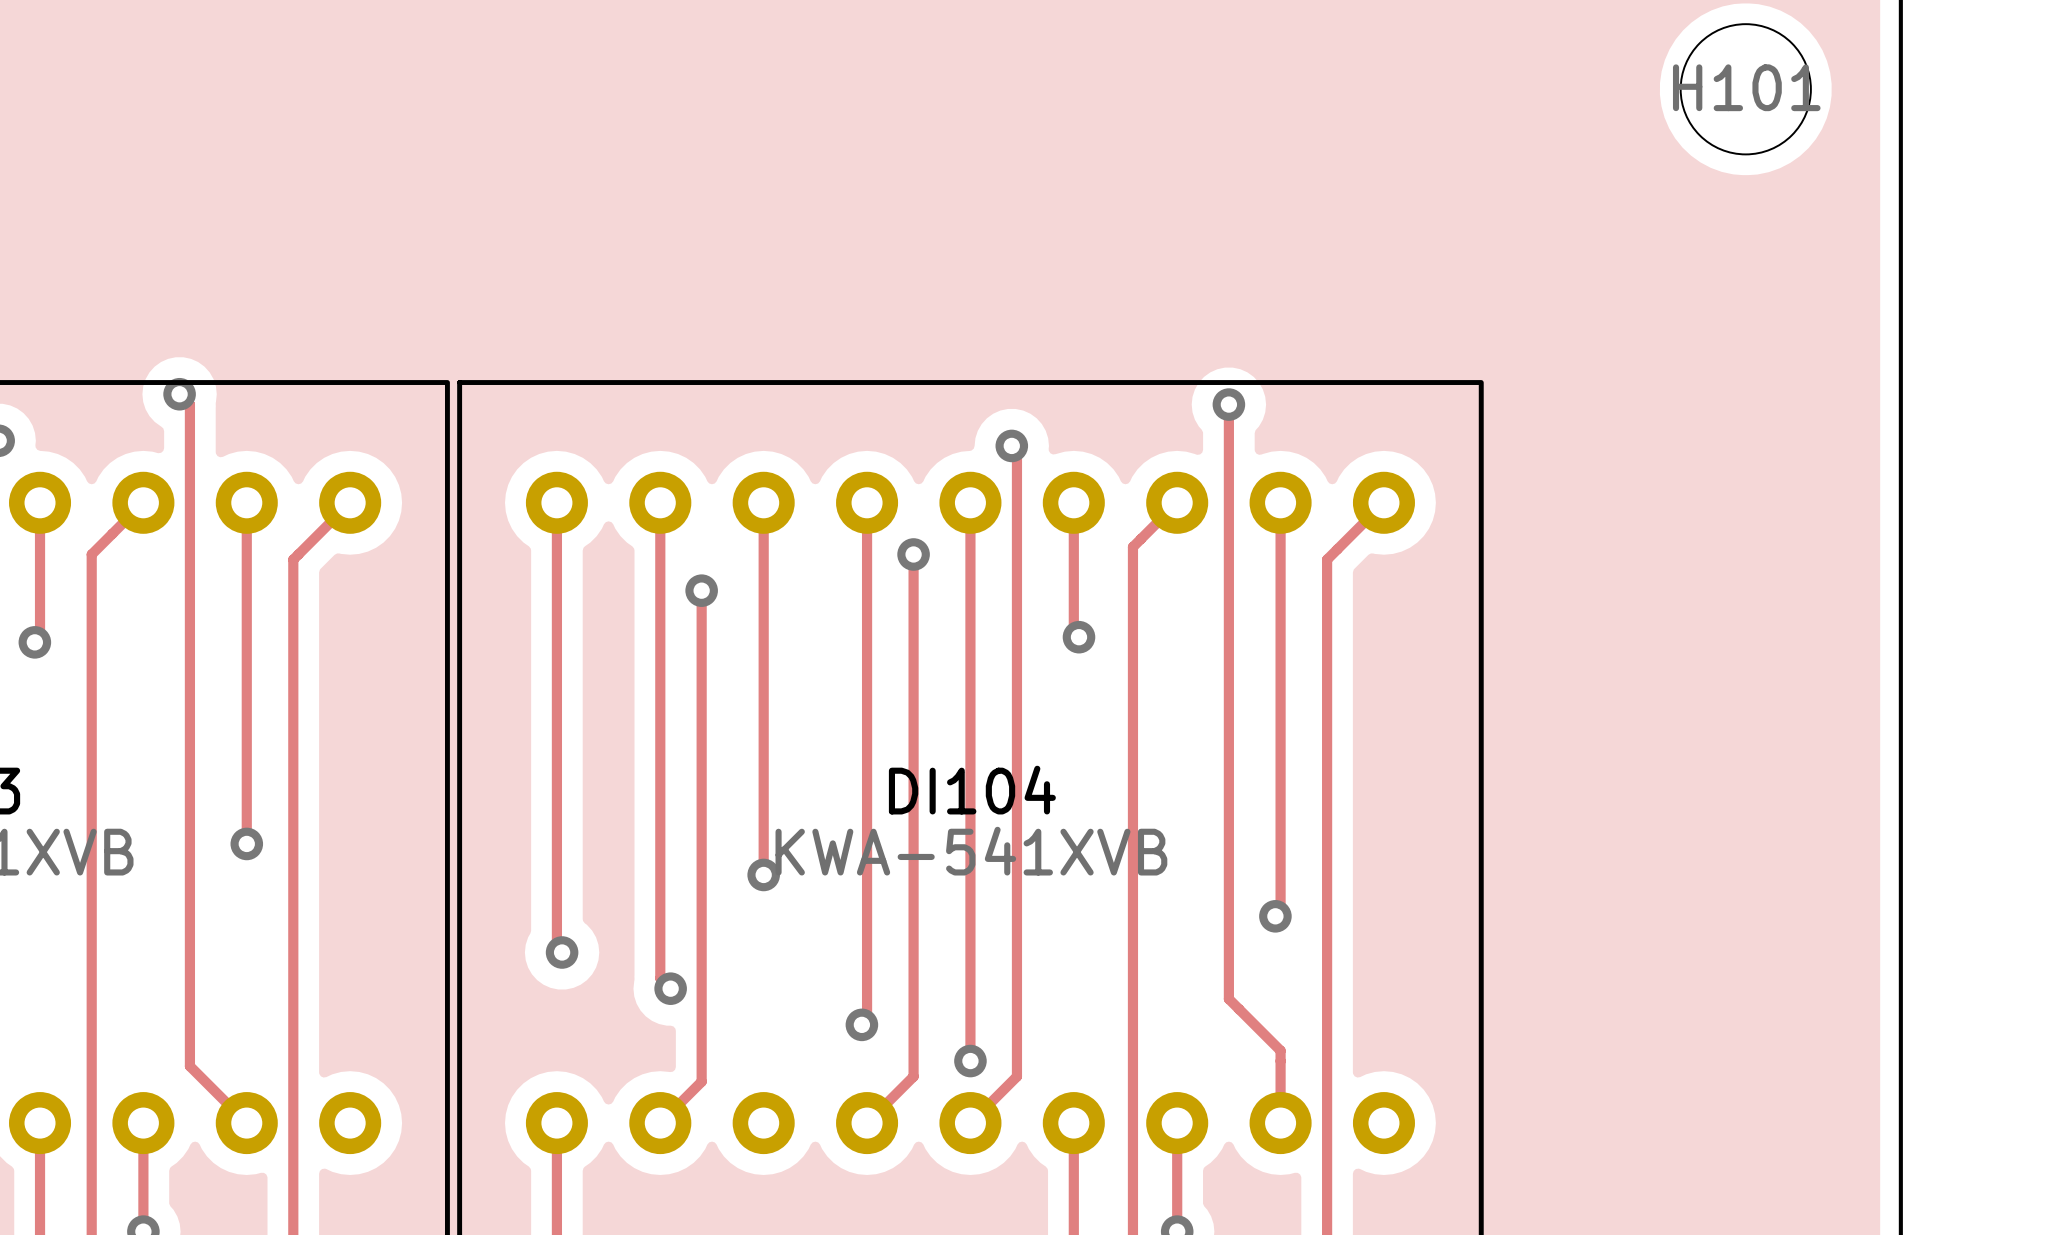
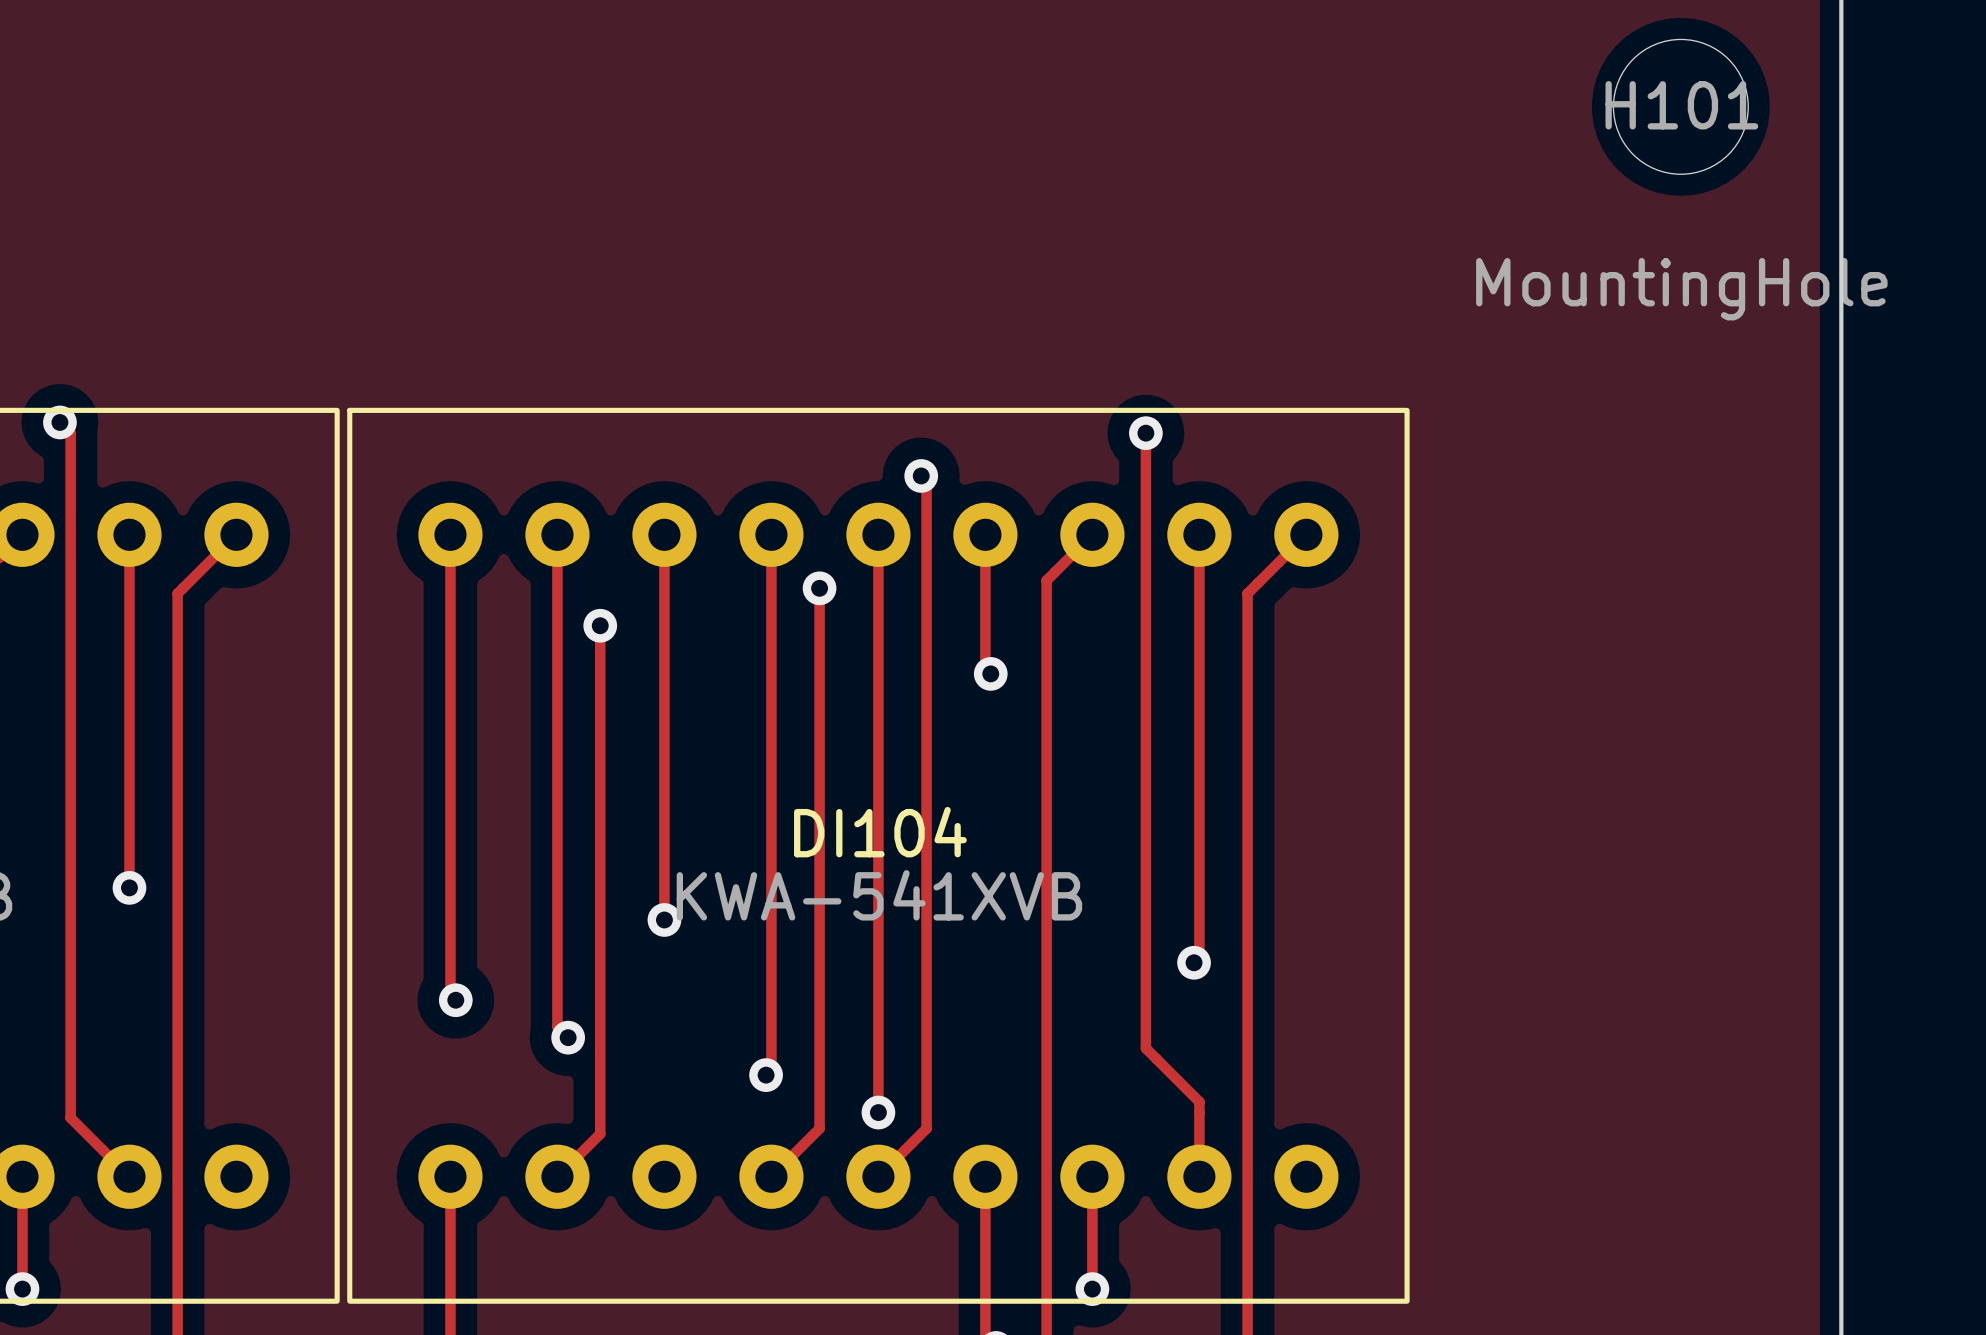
H101 value: none -> MountingHole (1681, 289)

